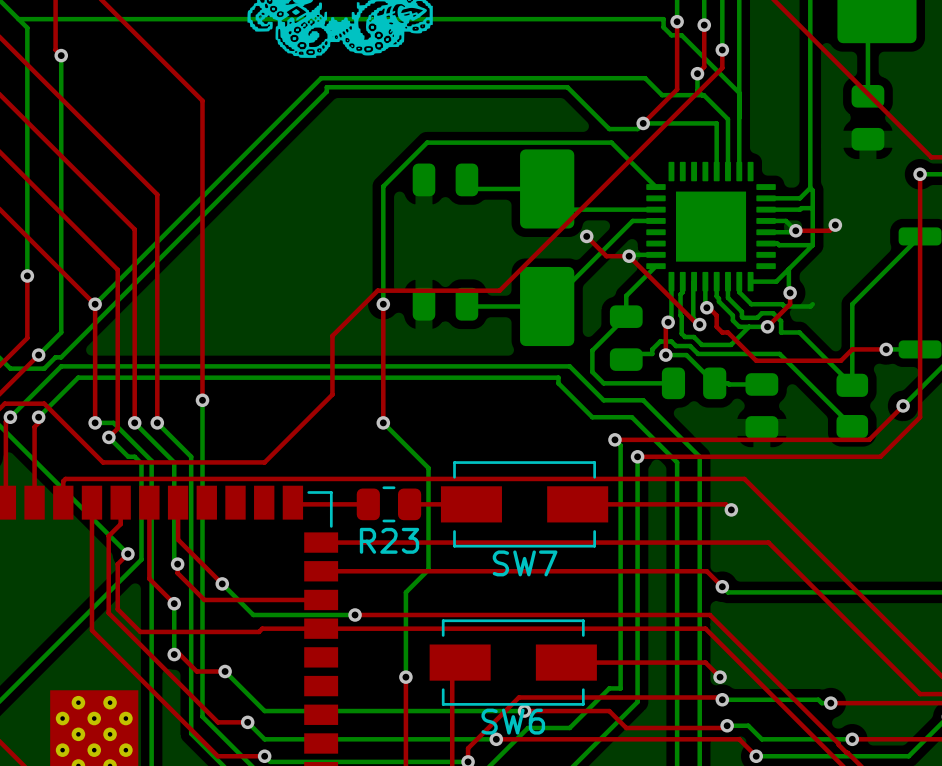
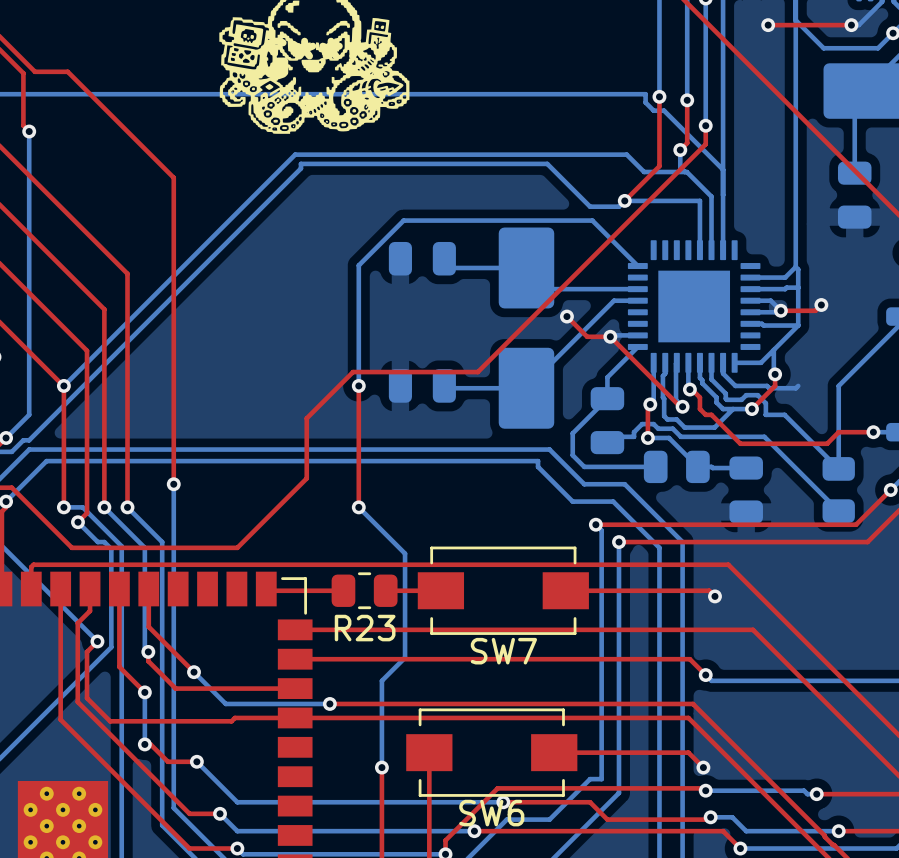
SW7 footprint: [440, 461, 609, 548] -> [417, 546, 589, 635]
SW6 footprint: [429, 619, 597, 706] -> [406, 708, 578, 797]

